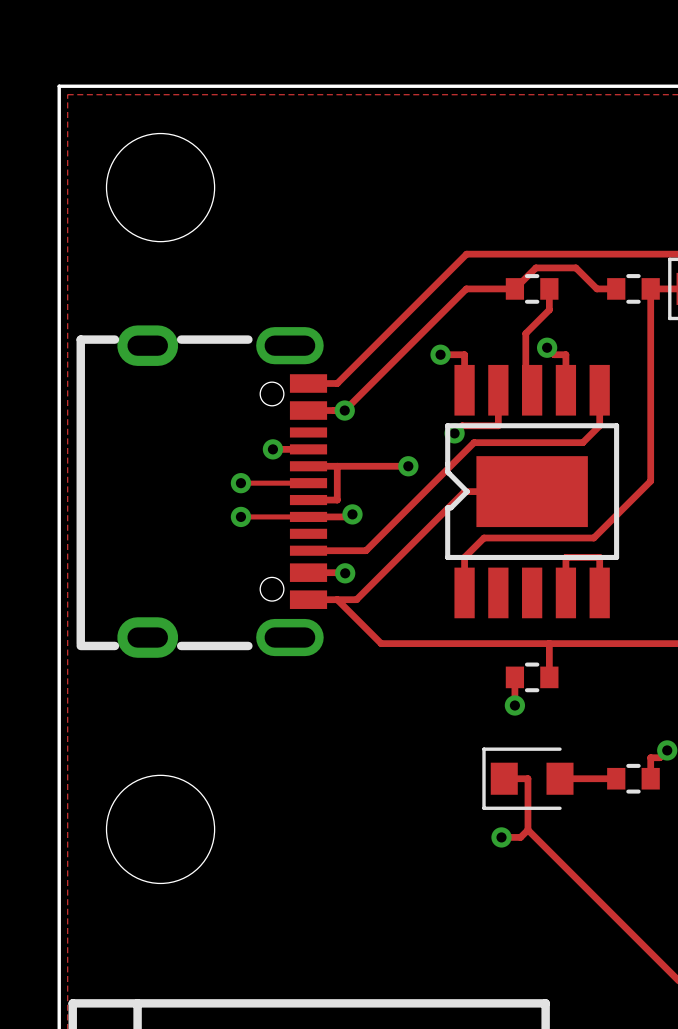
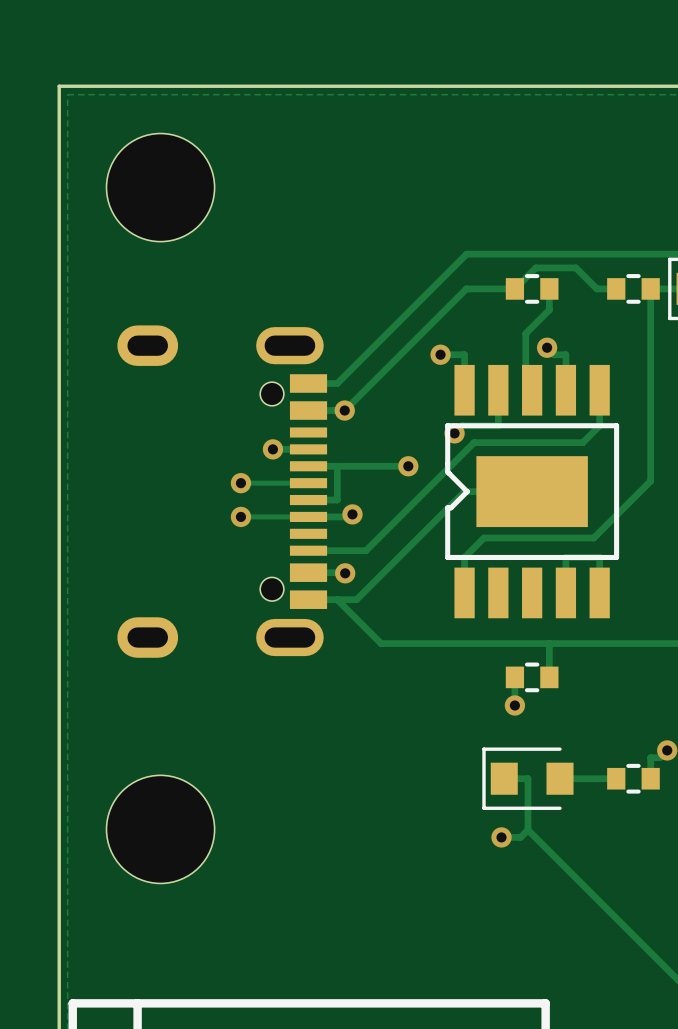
part footprint: [76, 325, 328, 658] -> [117, 325, 328, 658]

